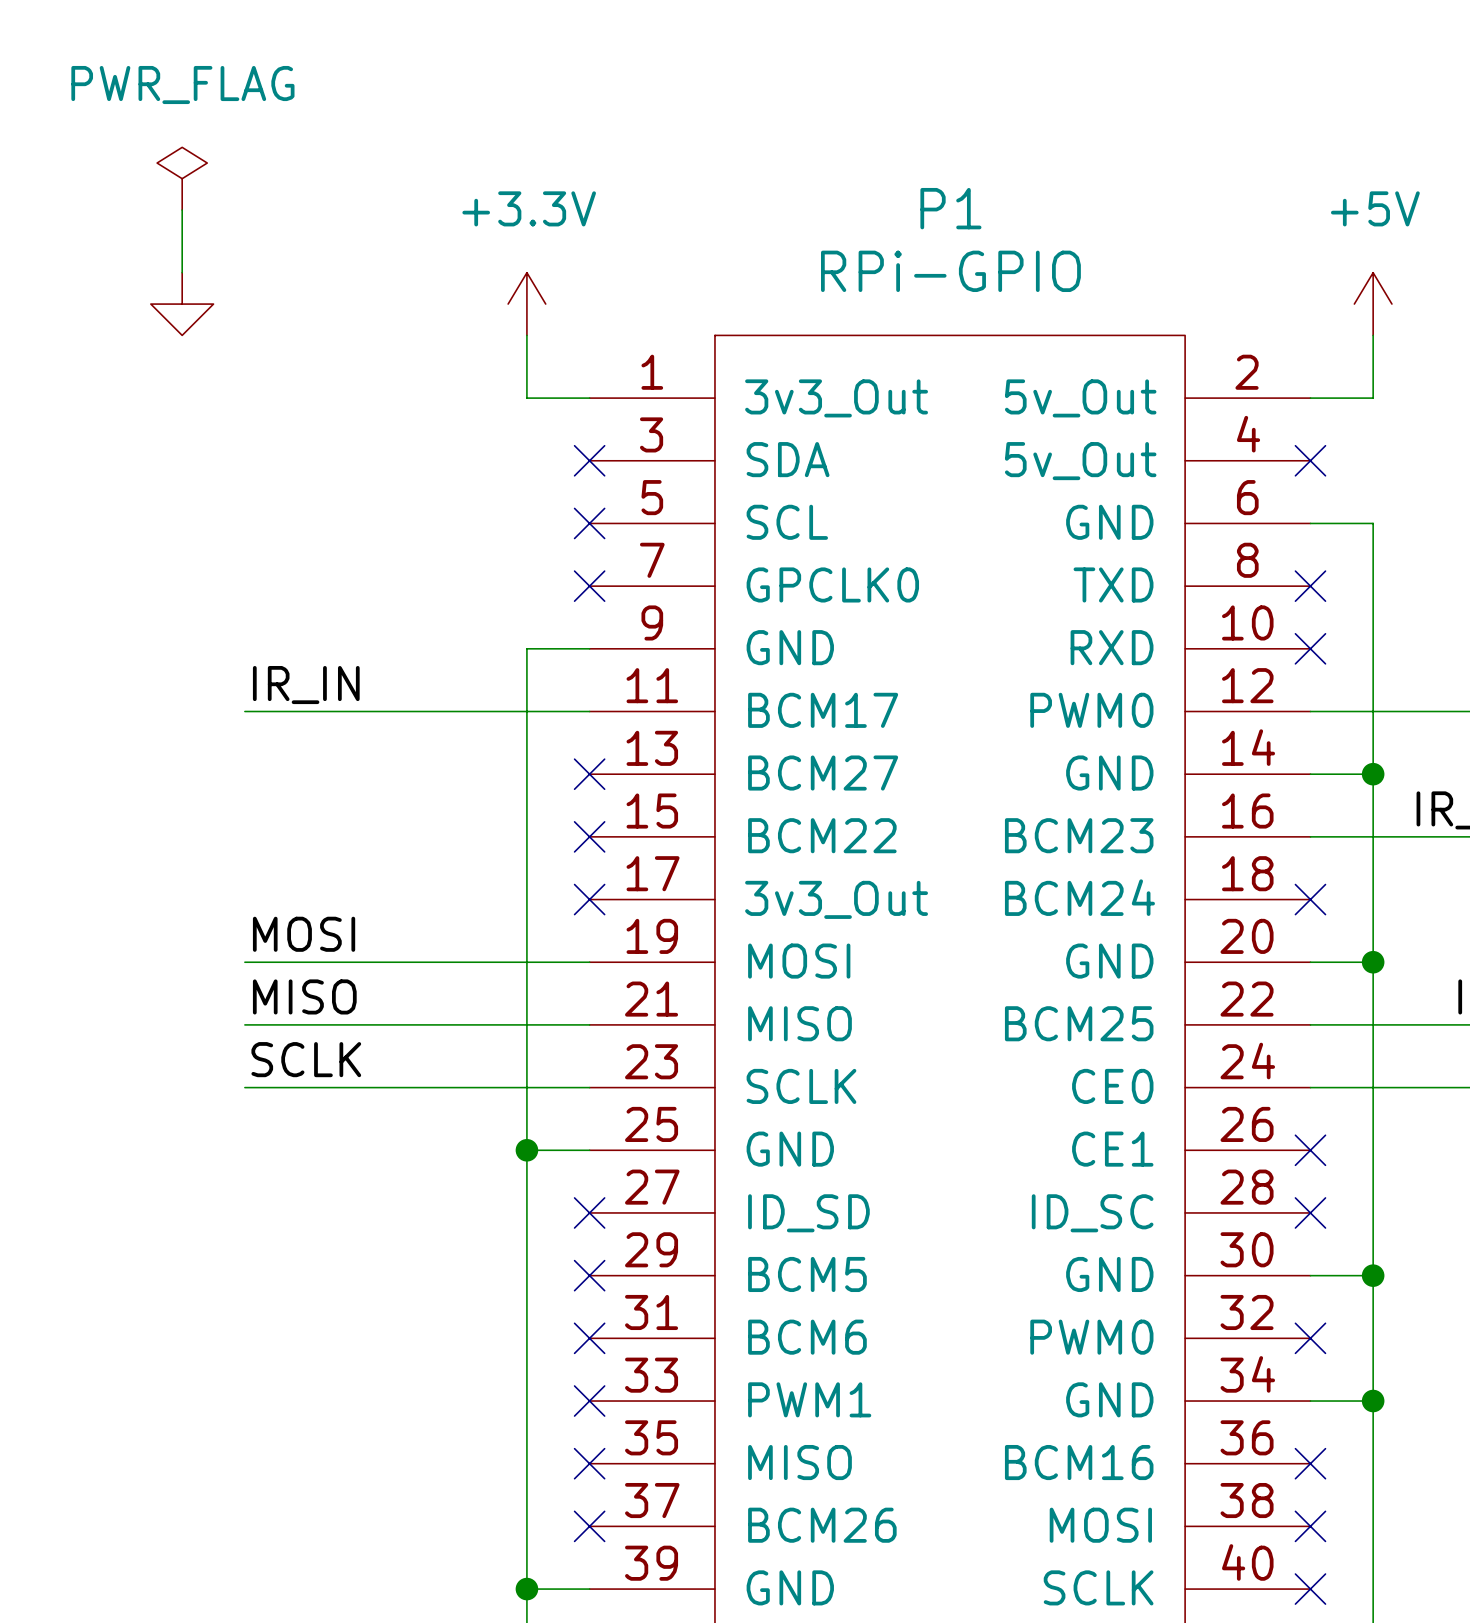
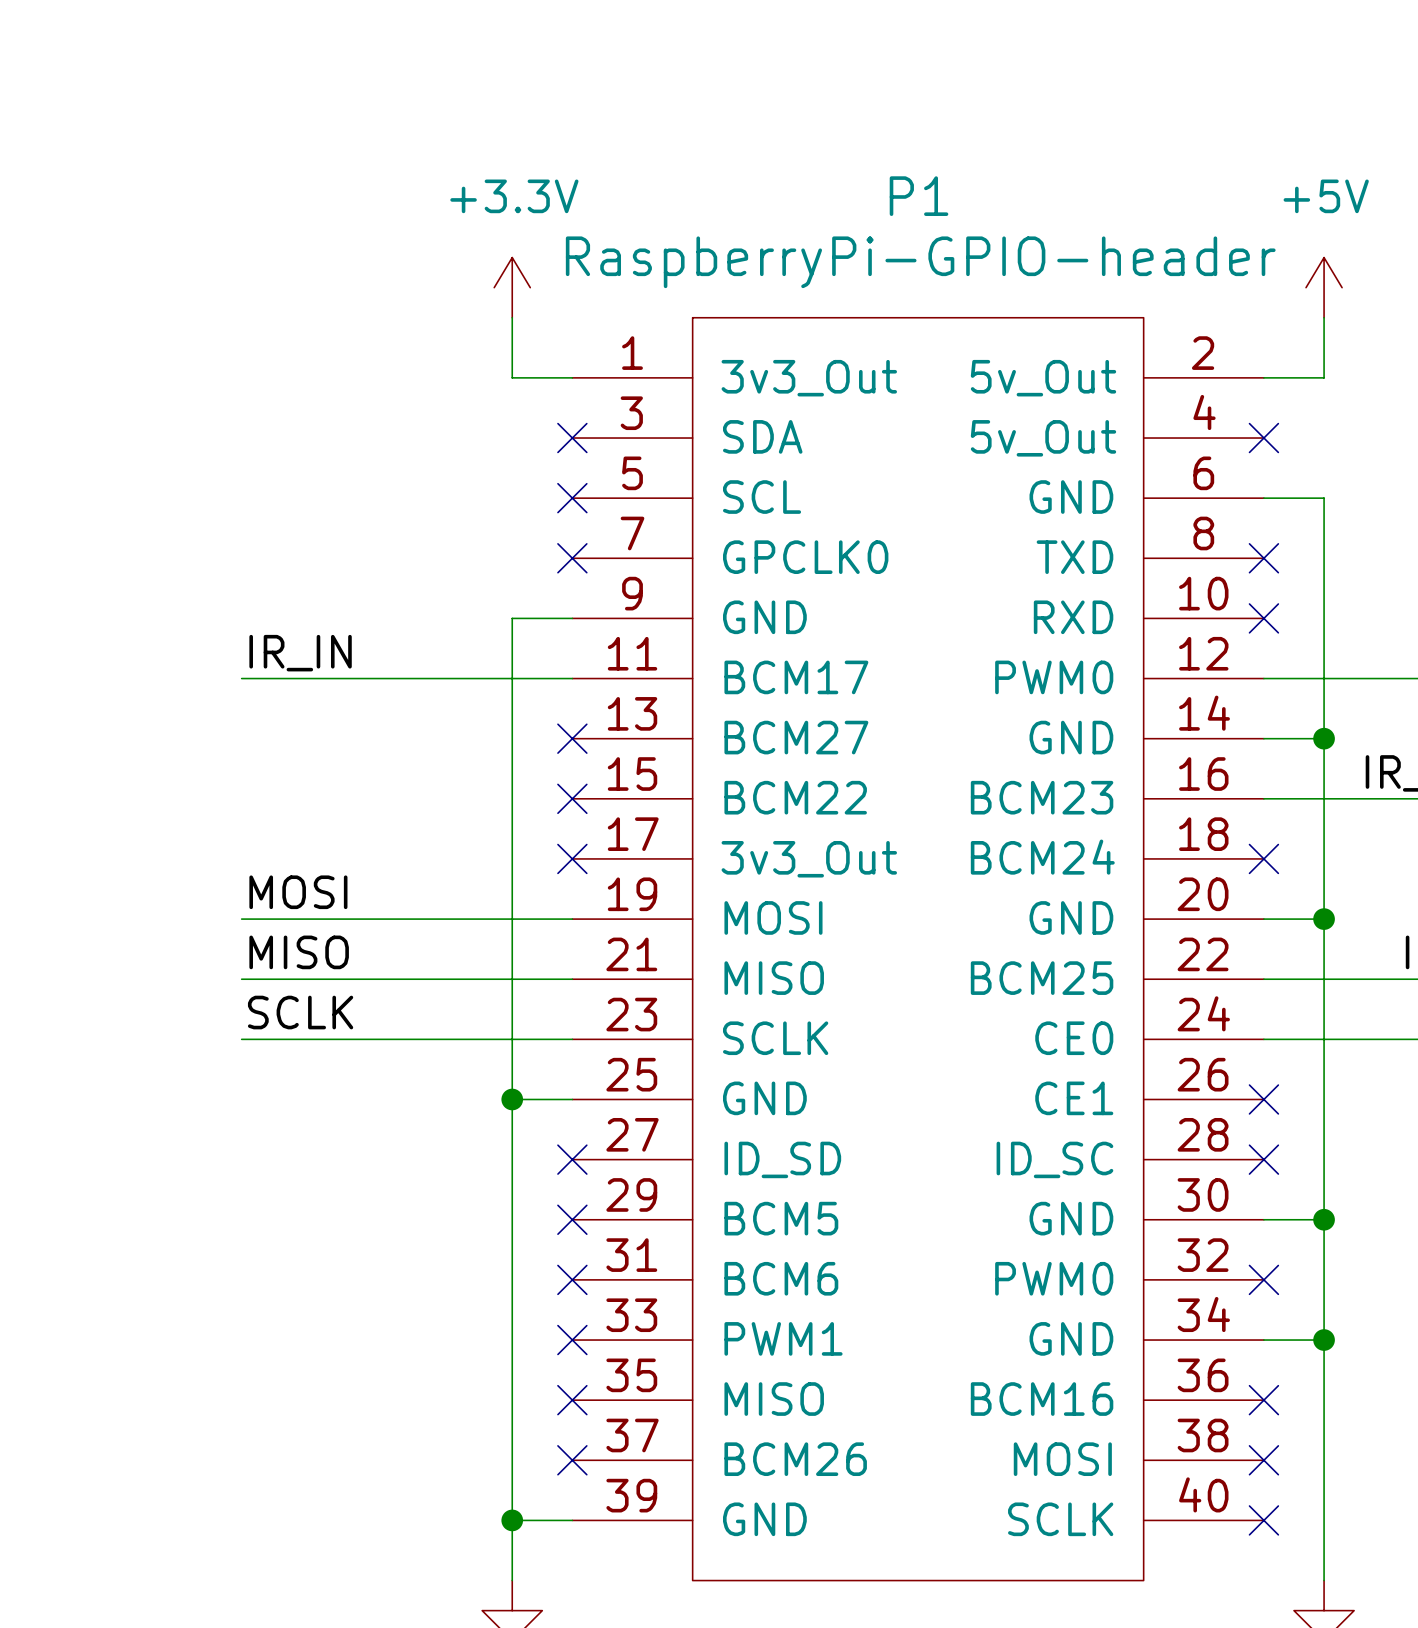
power symbol: PWR_FLAG (182, 178) -> none
wire: (182, 210) (182, 272) -> none
P1 value: RPi-GPIO (950, 271) -> RaspberryPi-GPIO-header (920, 262)
power symbol: (182, 304) -> none

